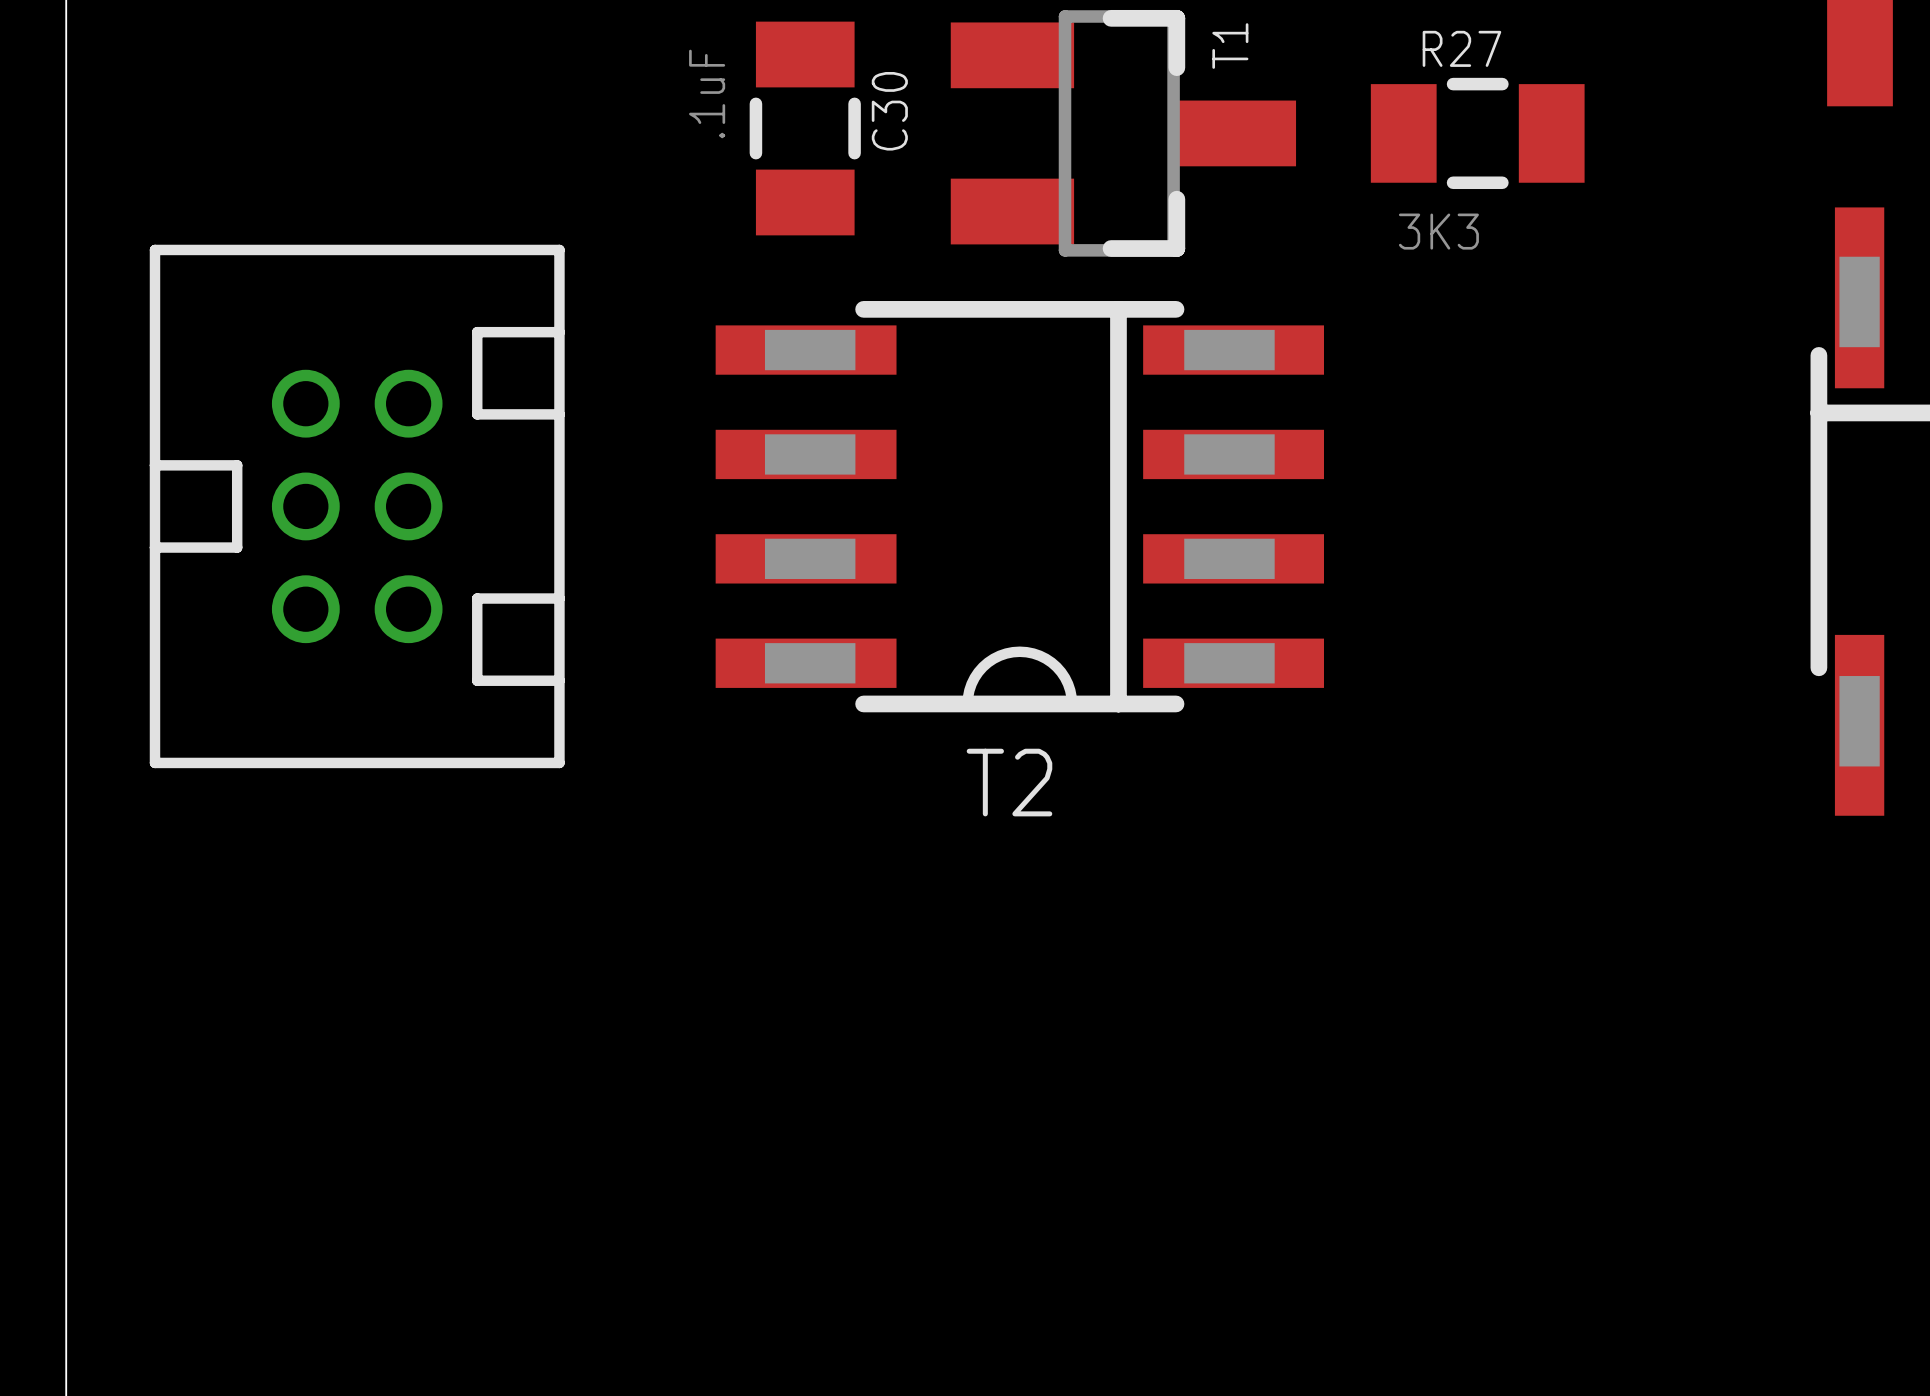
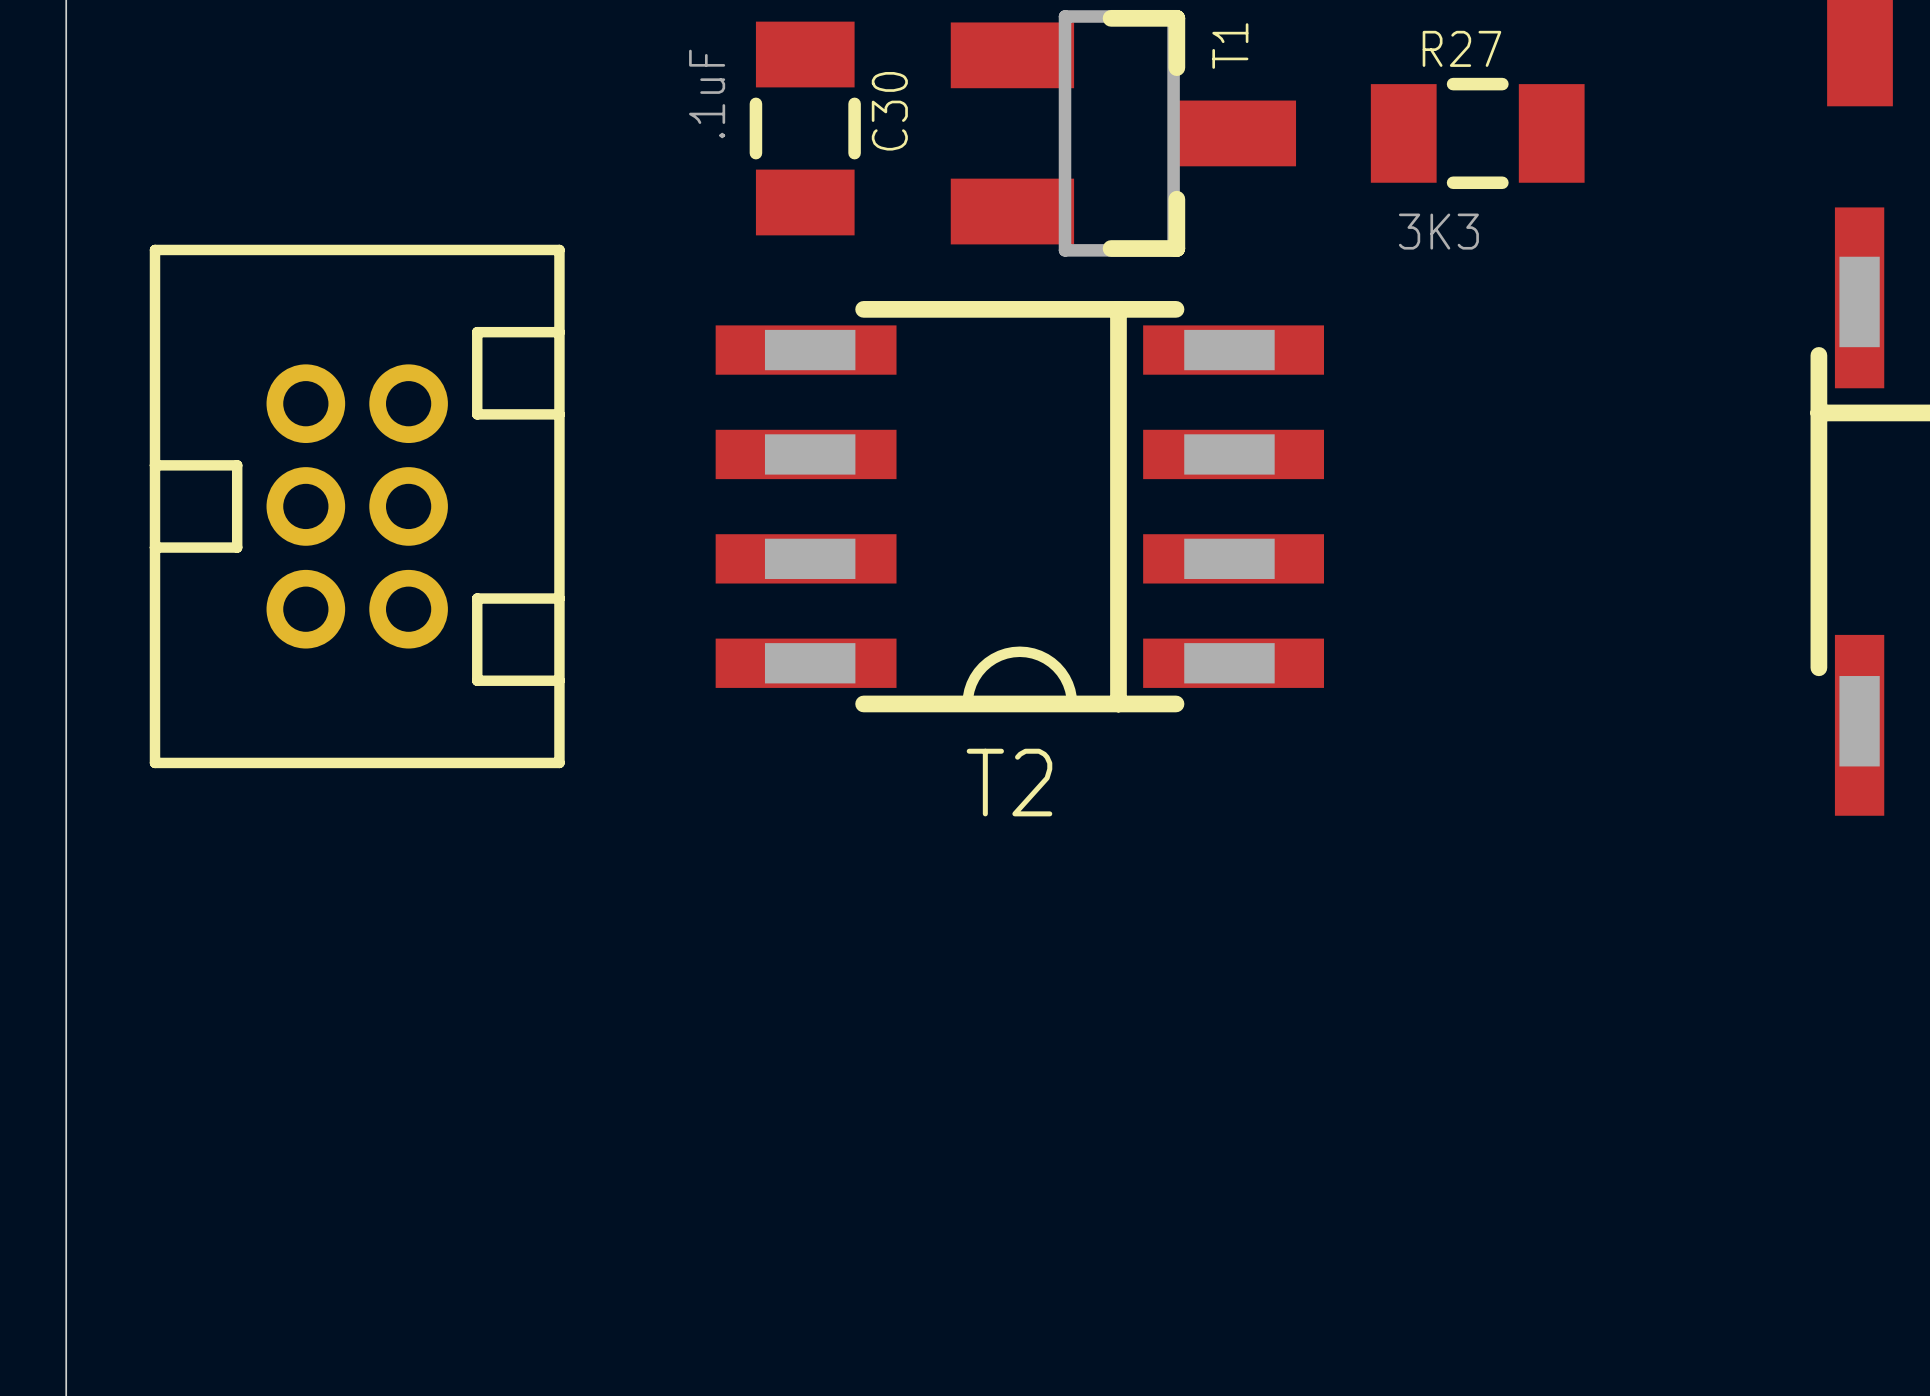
part footprint: [149, 244, 565, 769] -> [149, 244, 565, 769]

